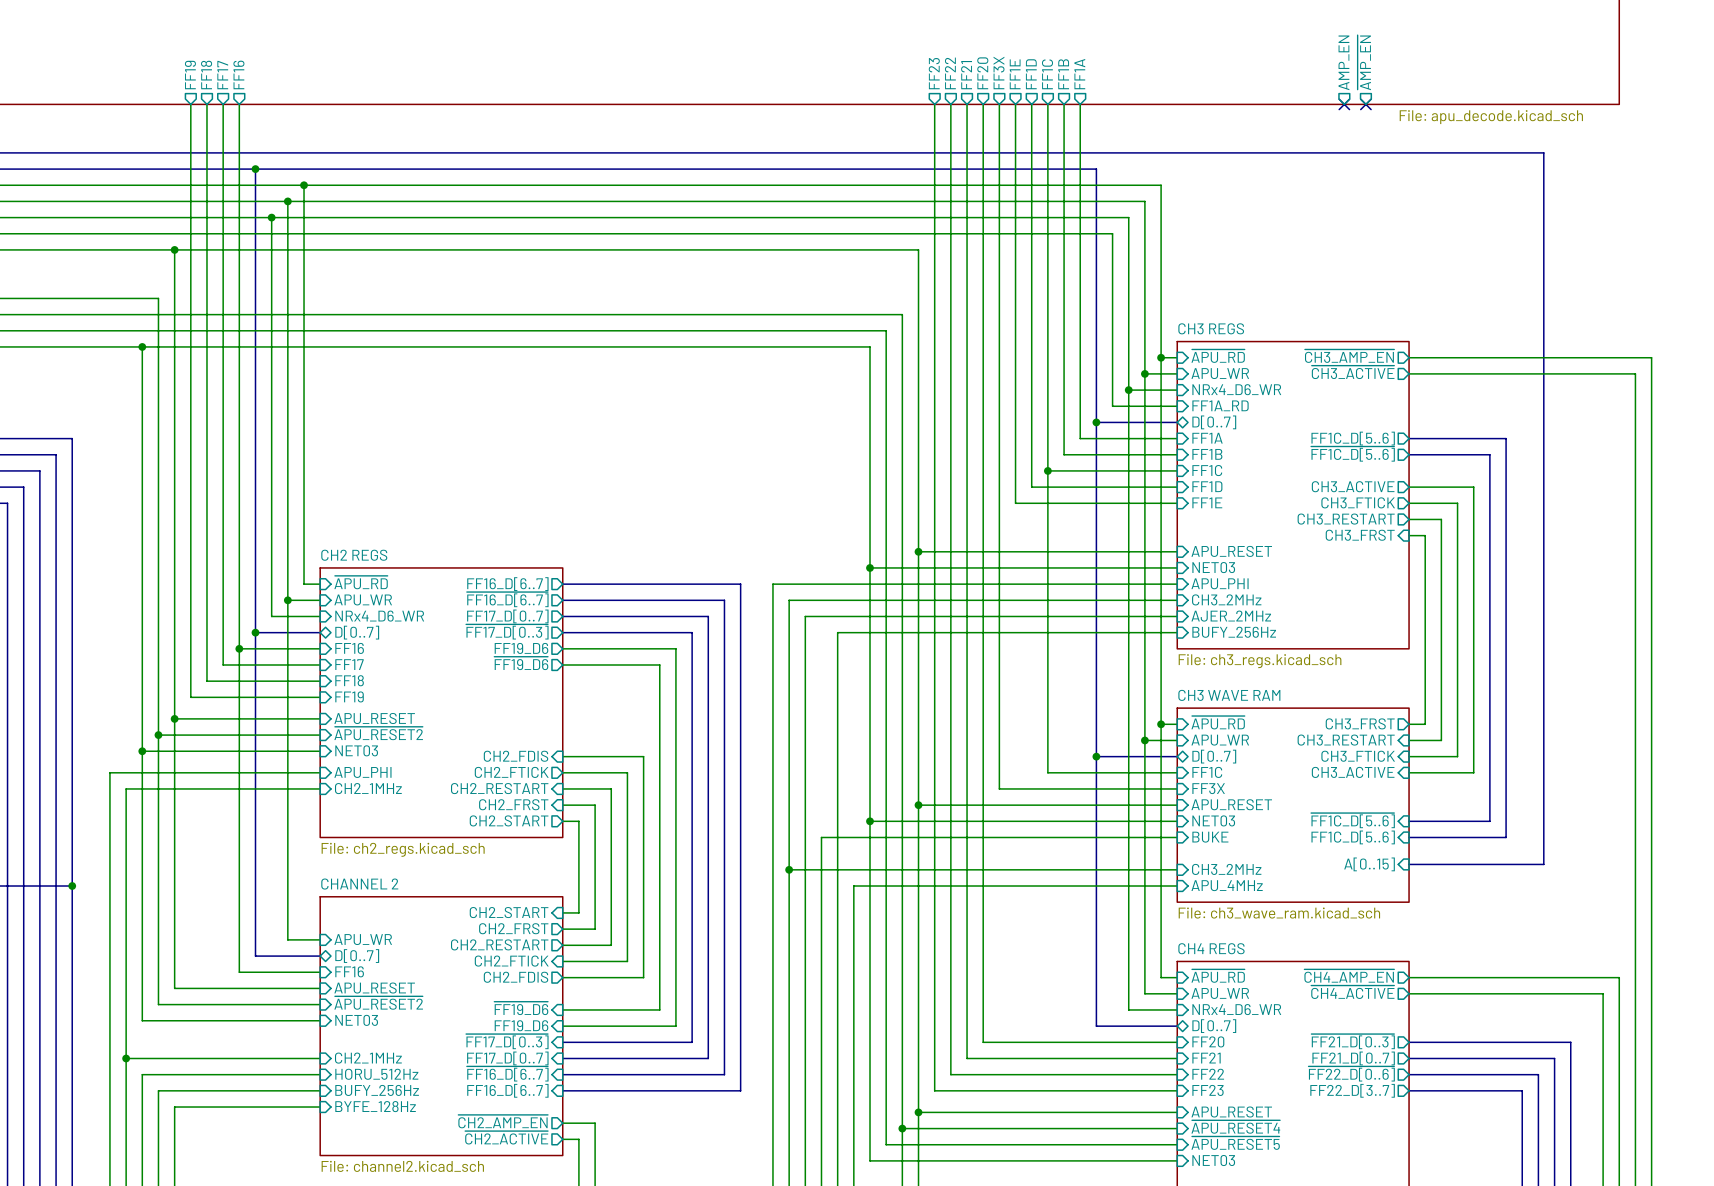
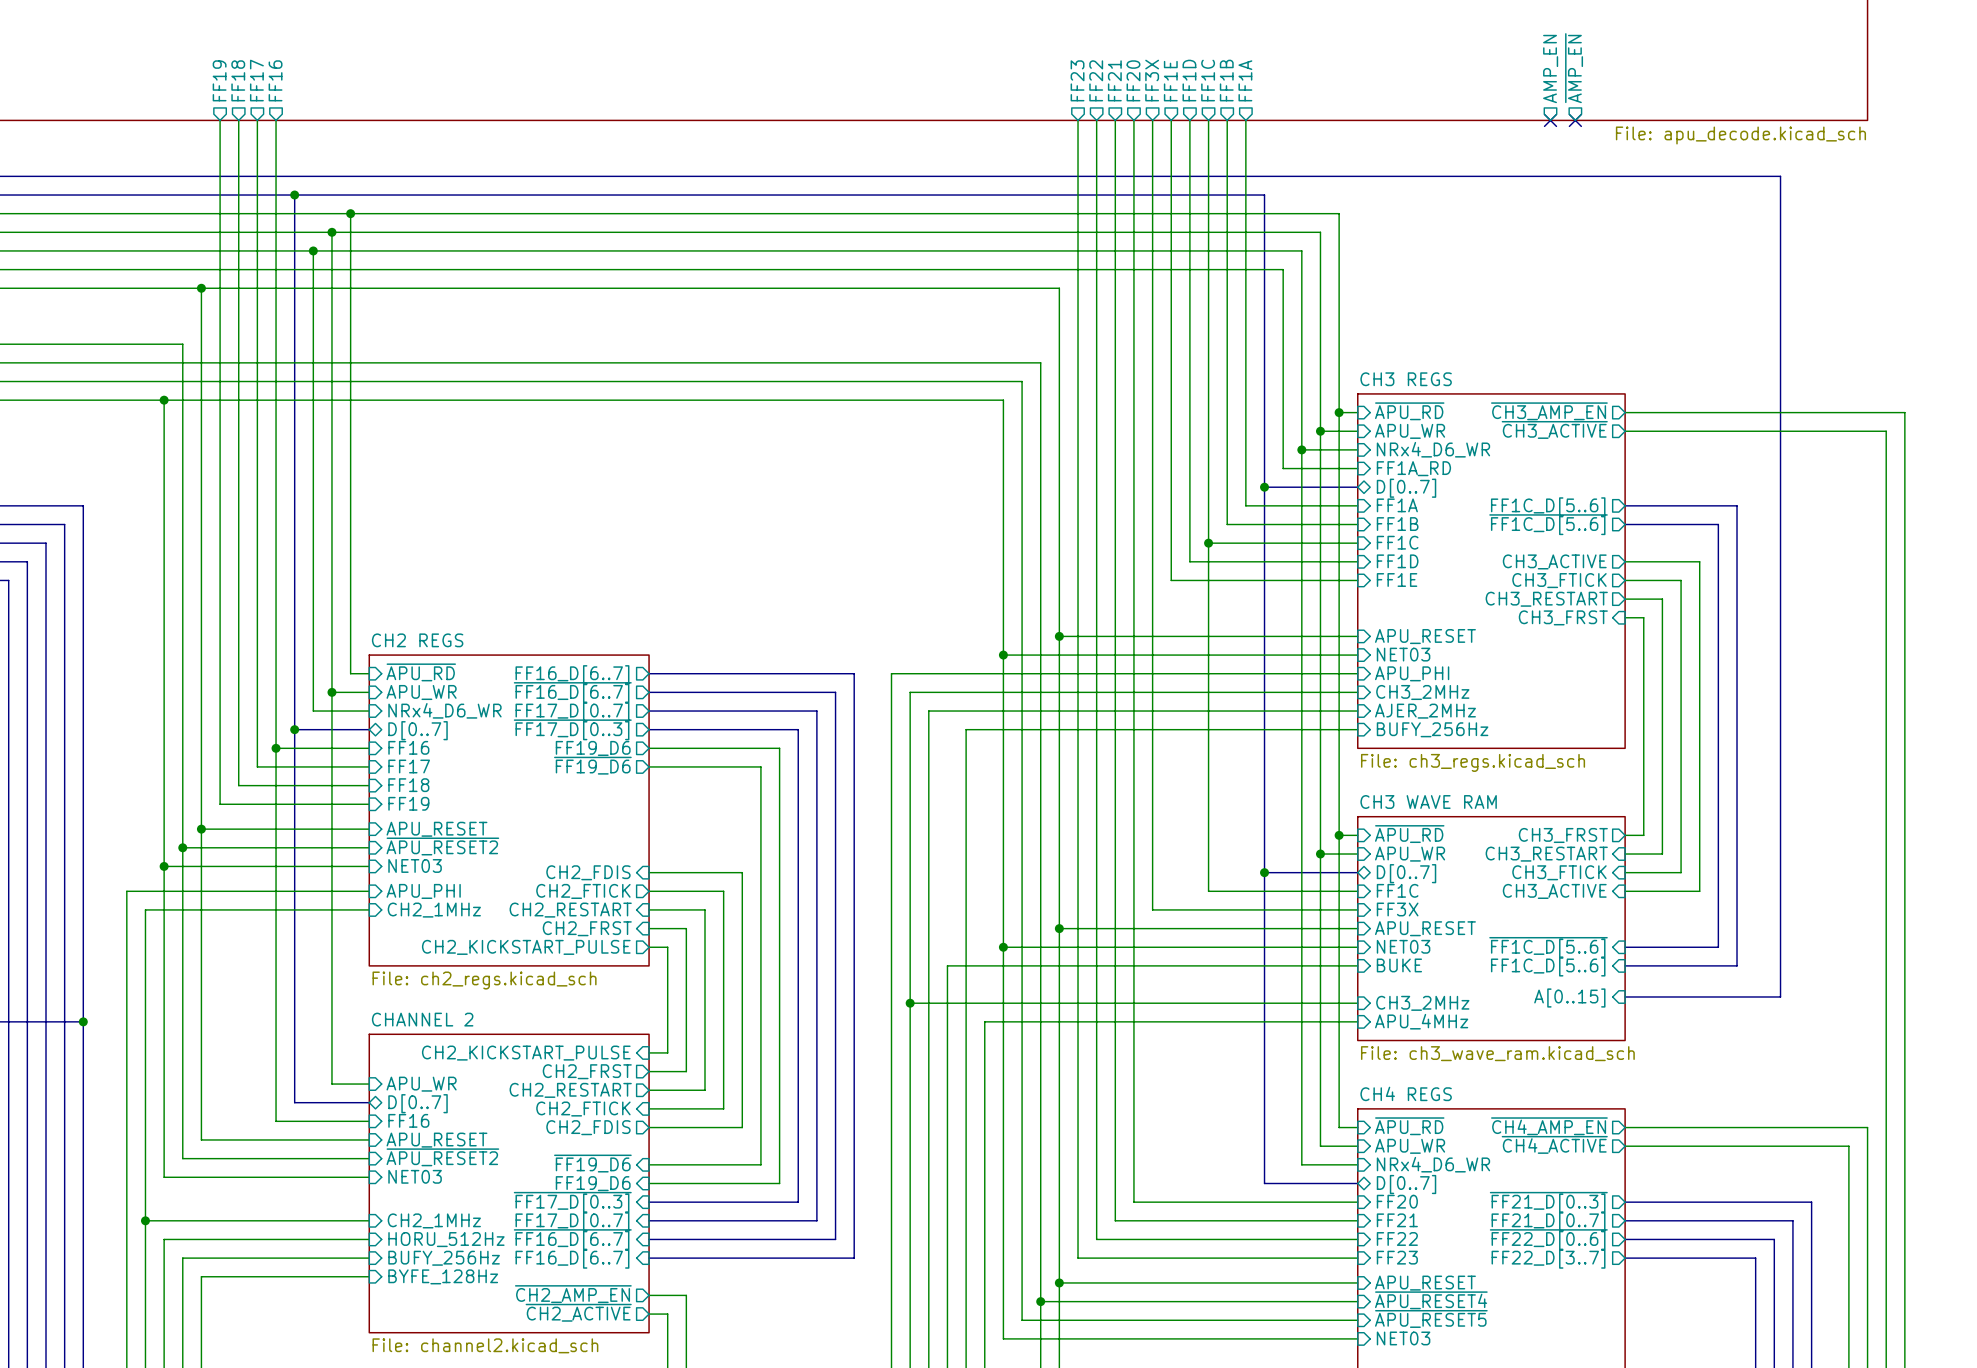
sheet pin: CH2_START (509, 820) -> CH2_KICKSTART_PULSE (526, 947)
sheet pin: CH2_START (509, 912) -> CH2_KICKSTART_PULSE (526, 1053)

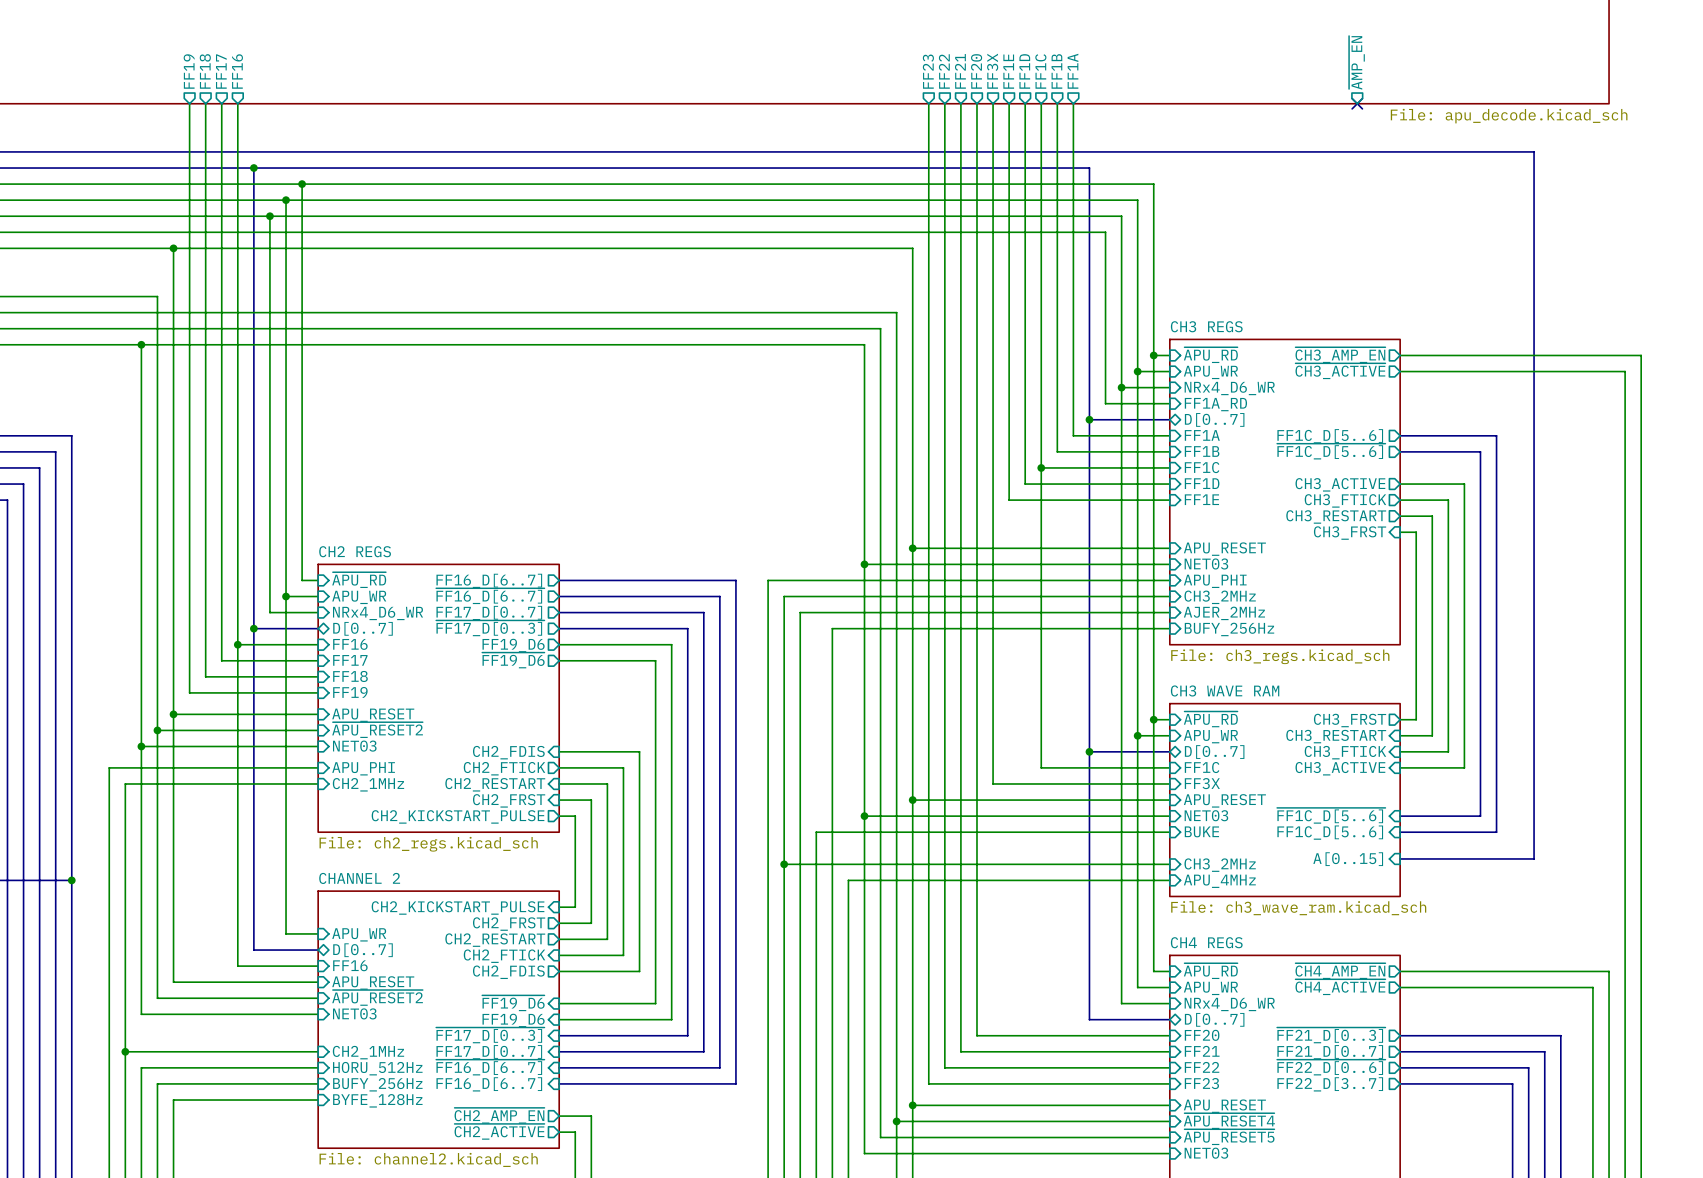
sheet pin: AMP_EN (1550, 68) -> none
no-connect mark: (1550, 120) -> none

